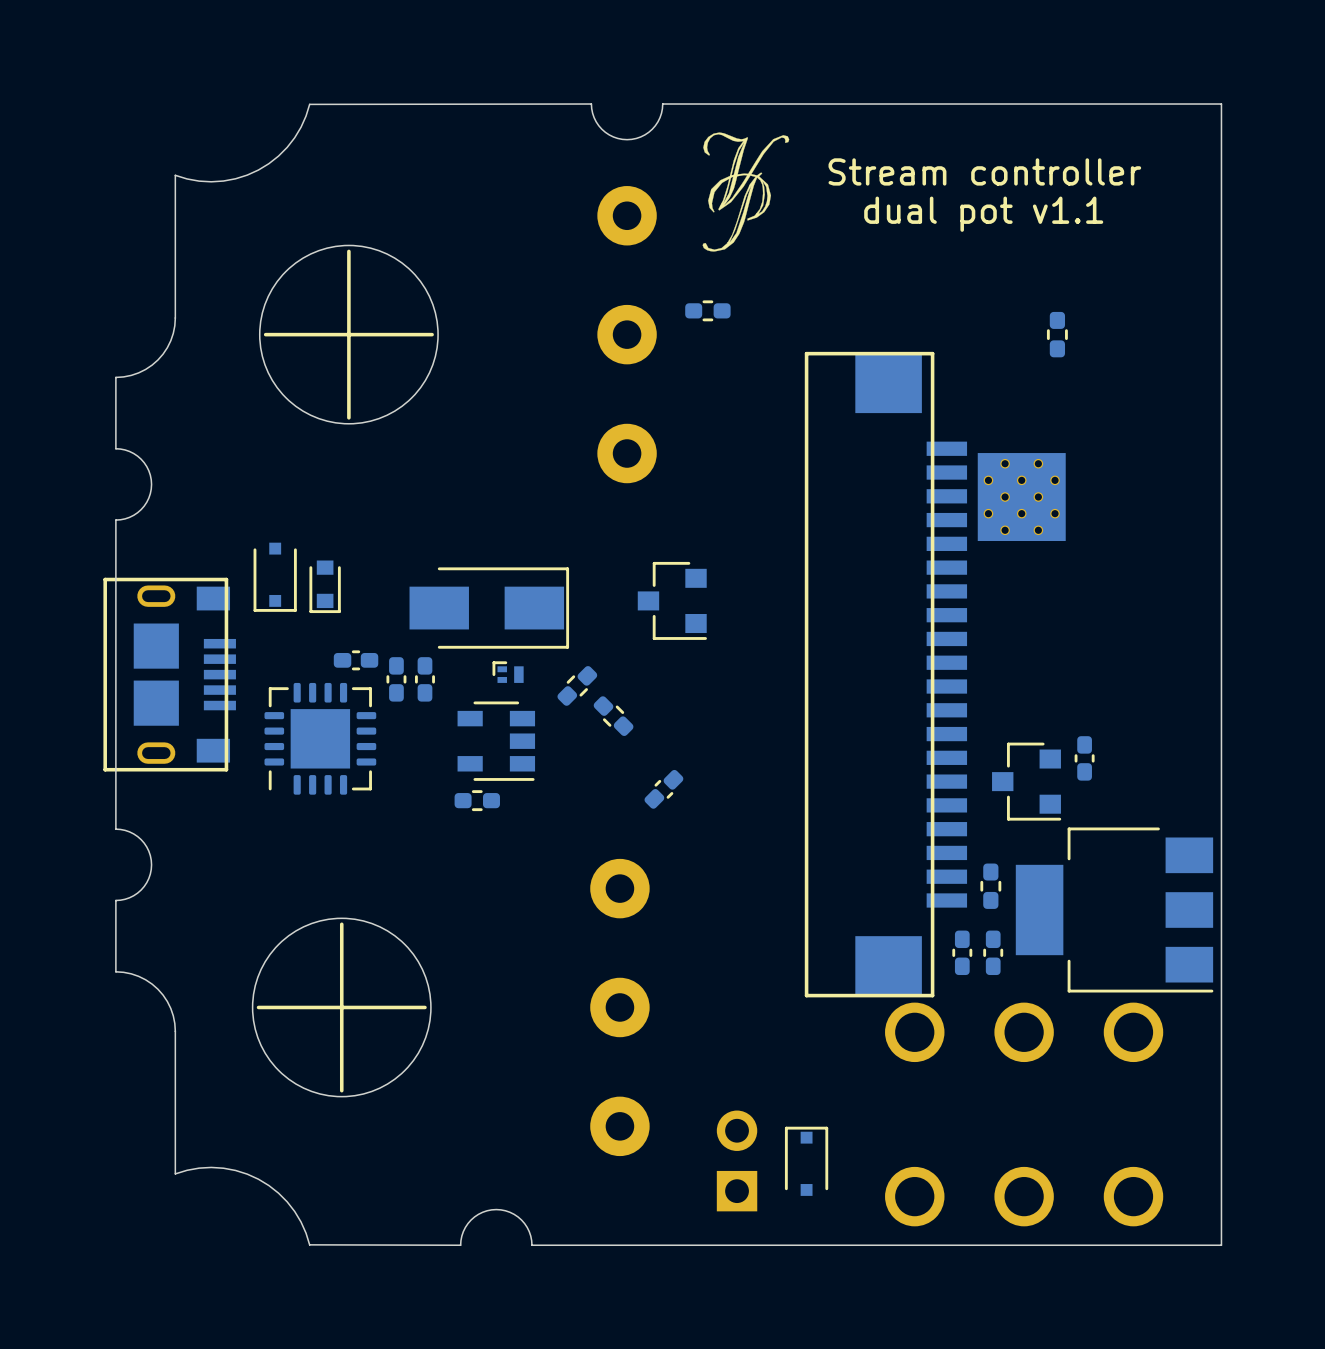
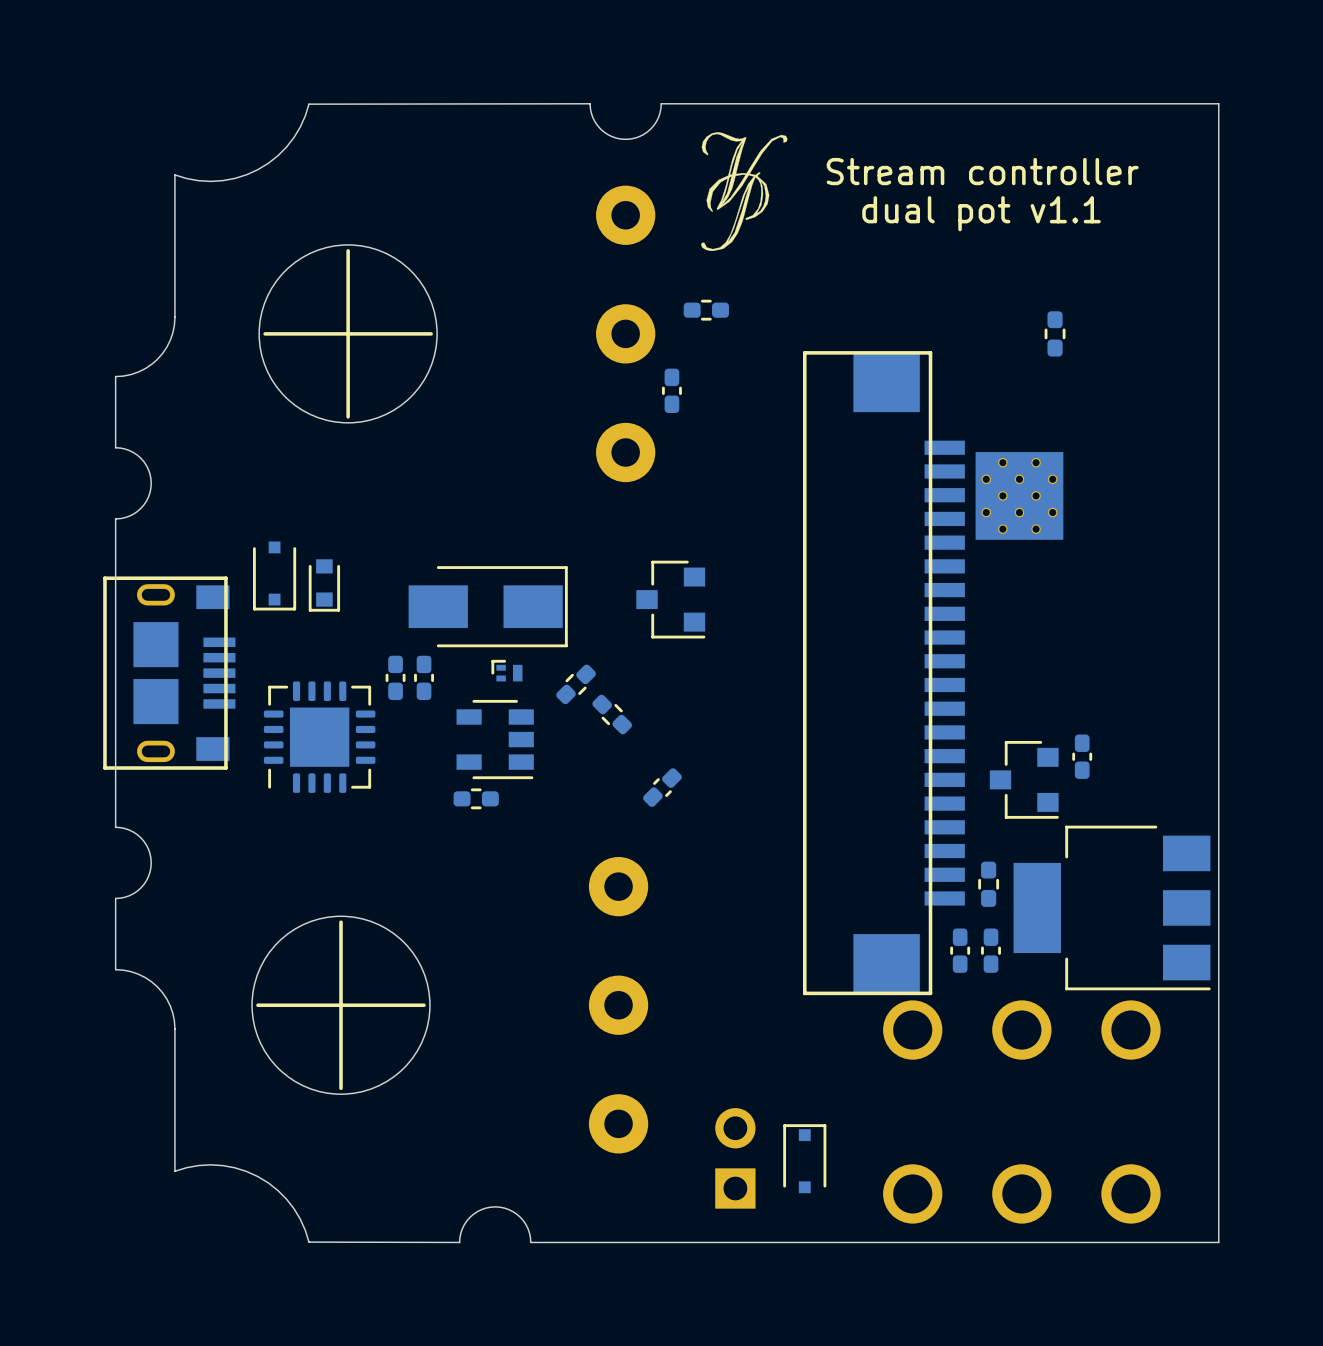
part rotation: 0° (356, 660) -> 90° clockwise (671, 390)
part position: (356, 660) -> (671, 390)

